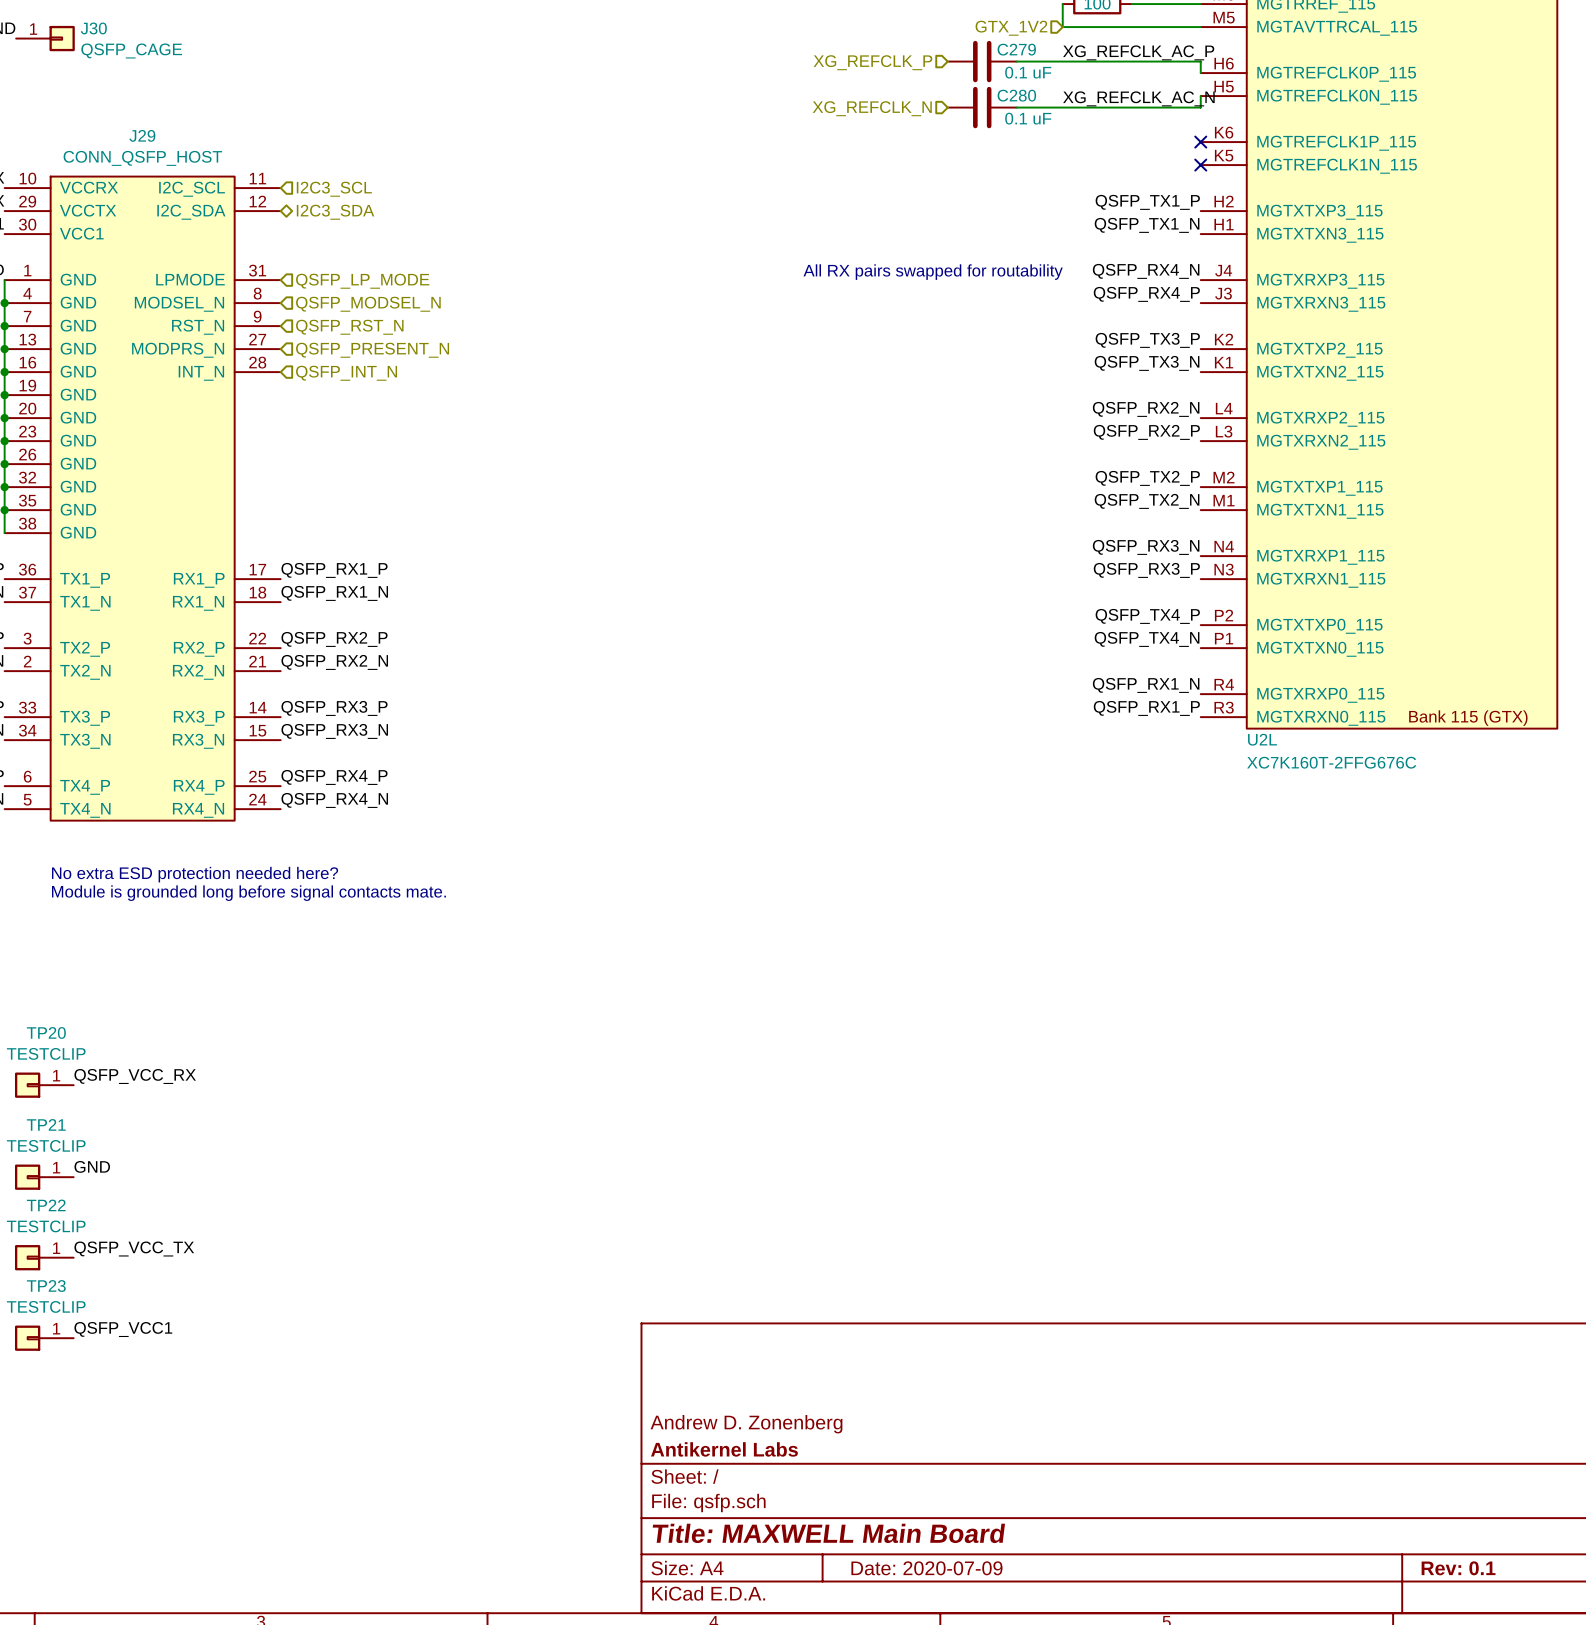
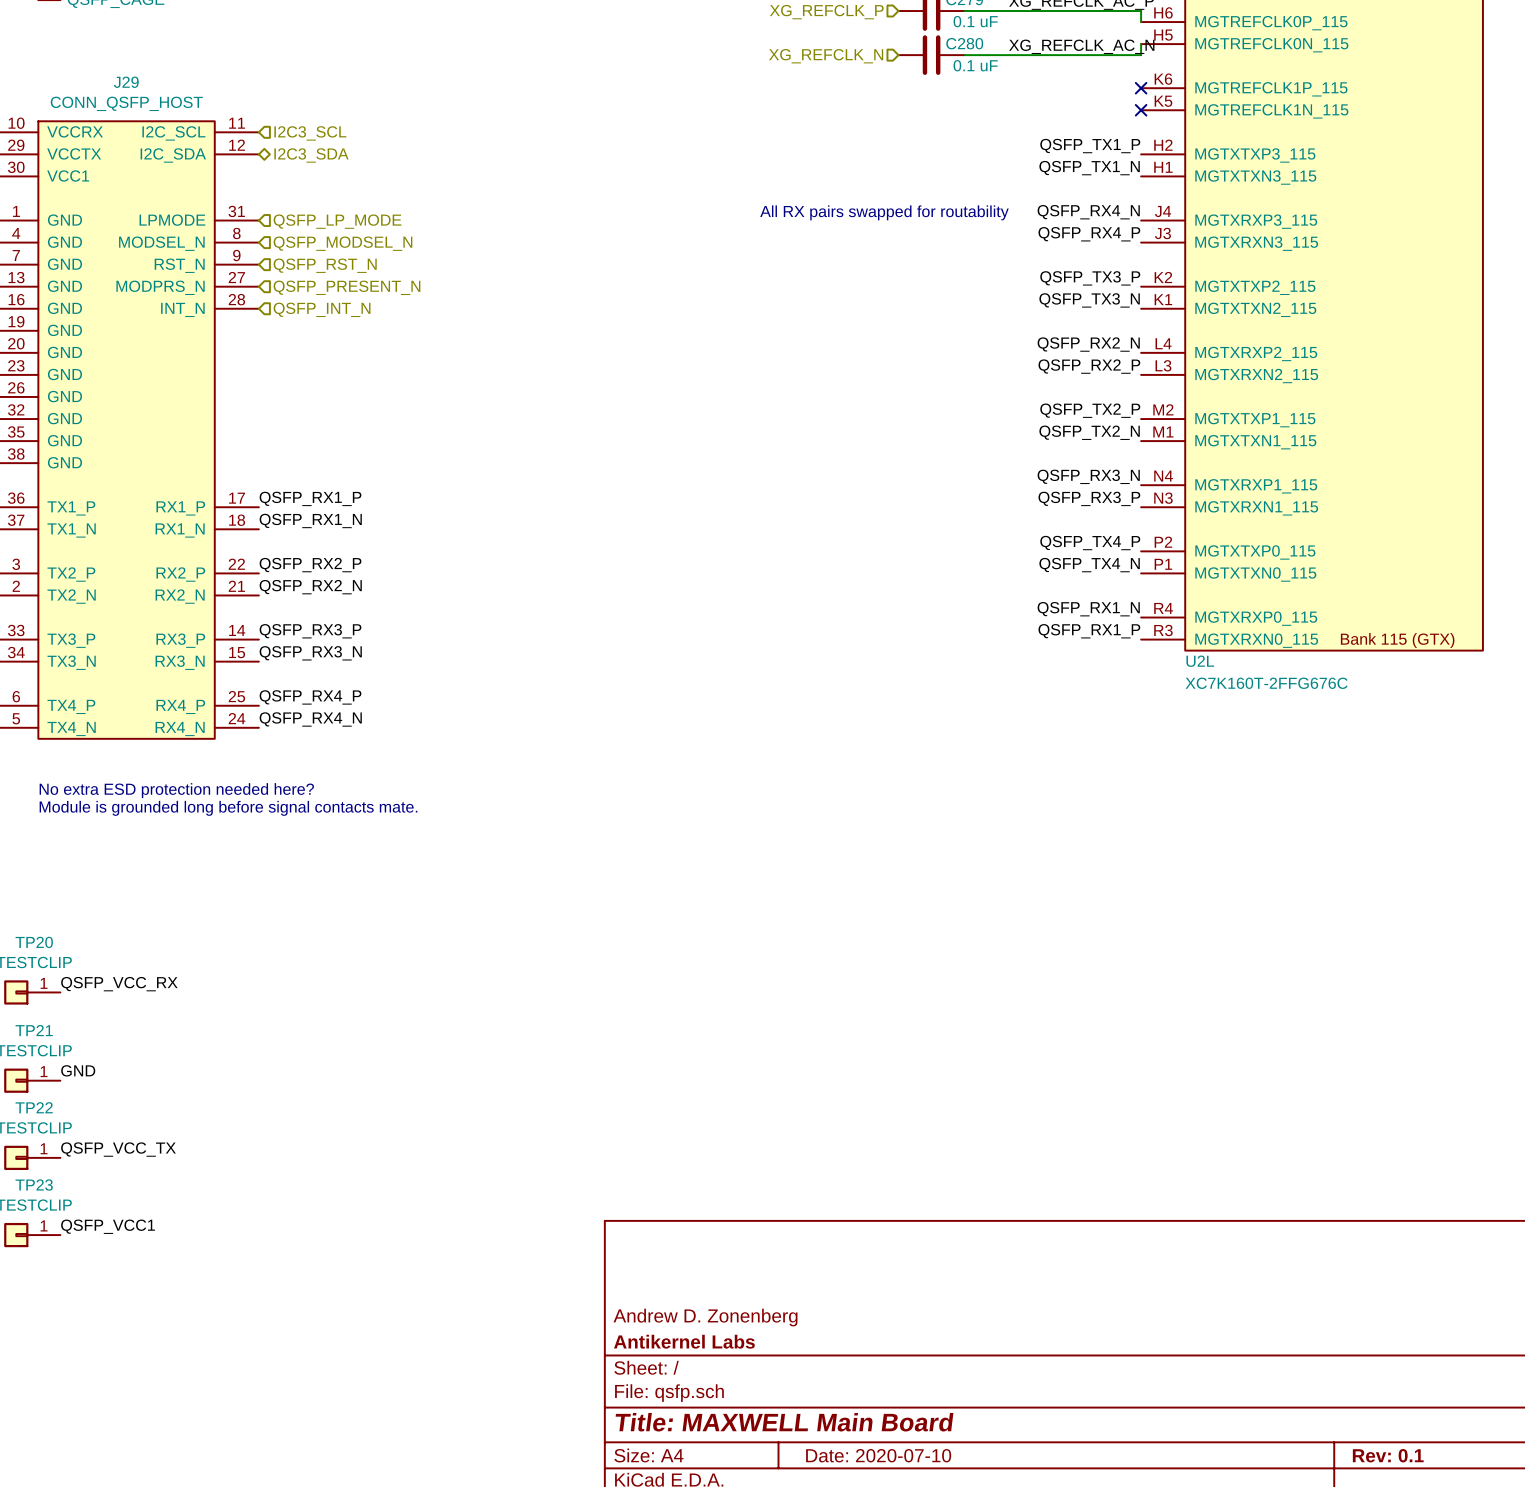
title block: Date: 2020-07-09 (926, 1568) -> Date: 2020-07-10 (878, 1455)

